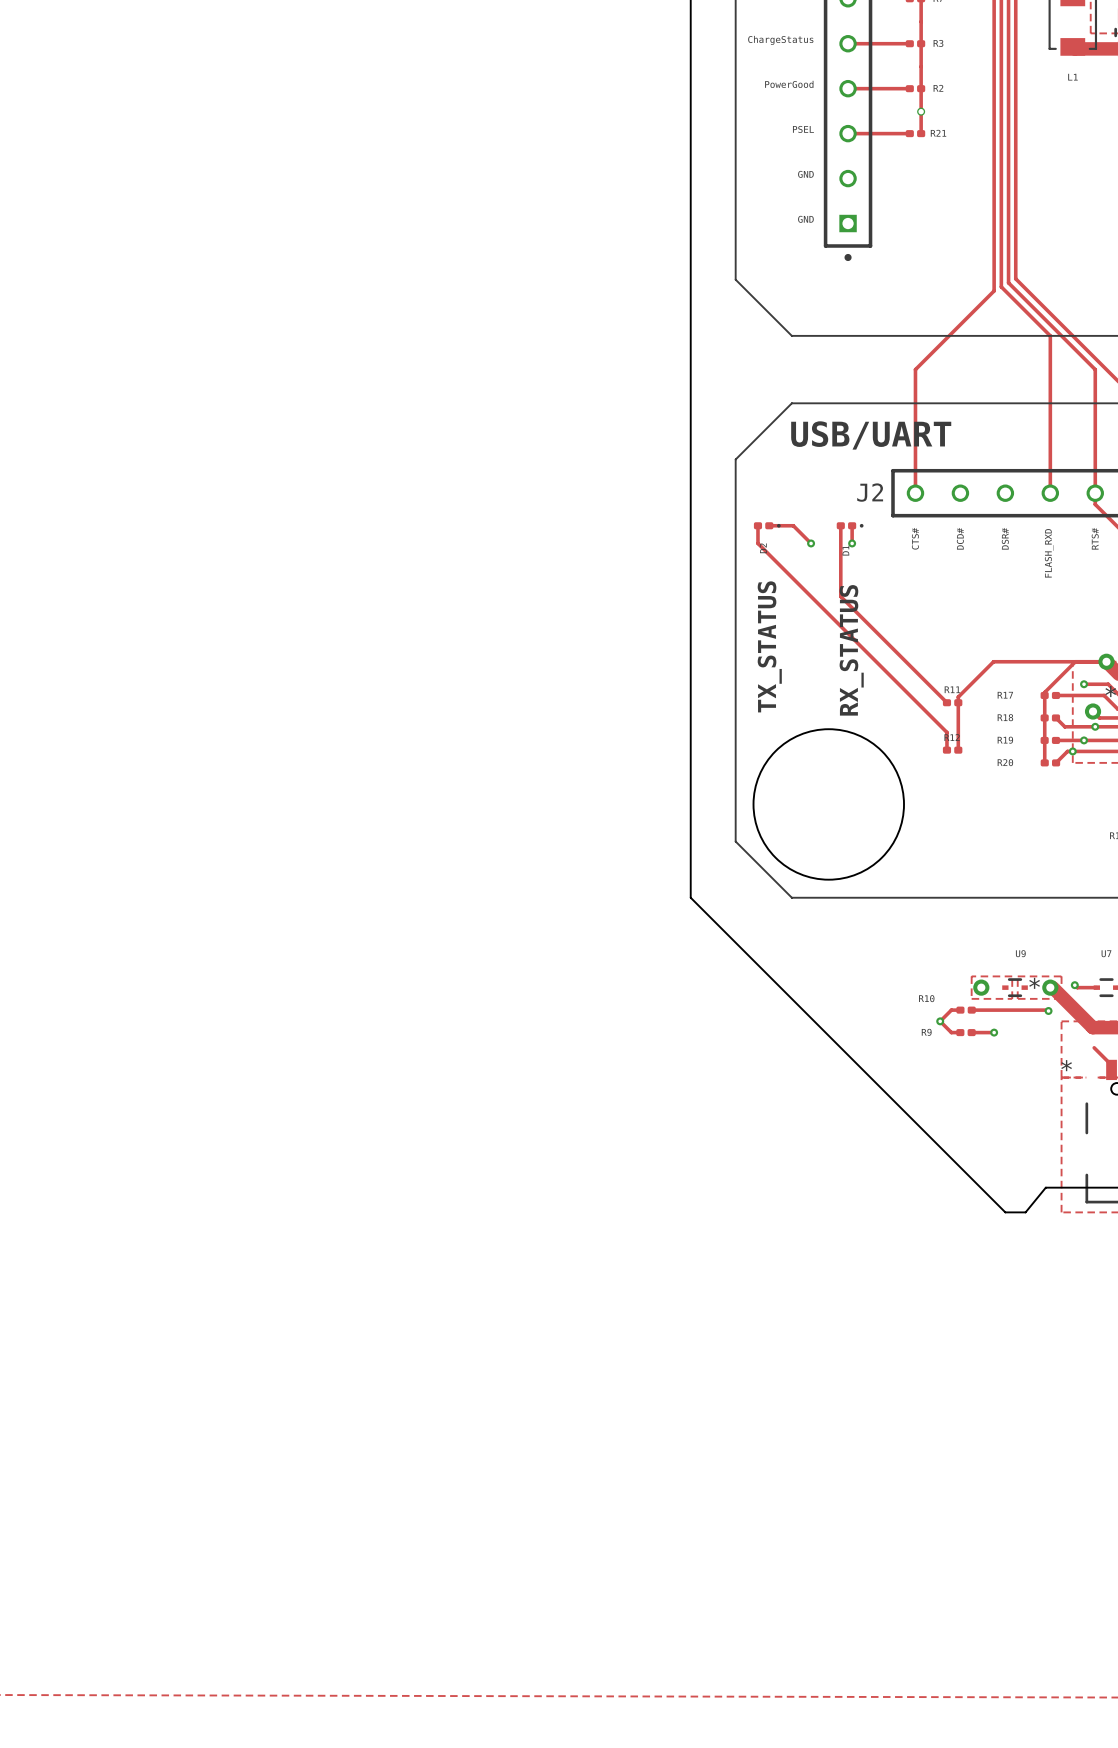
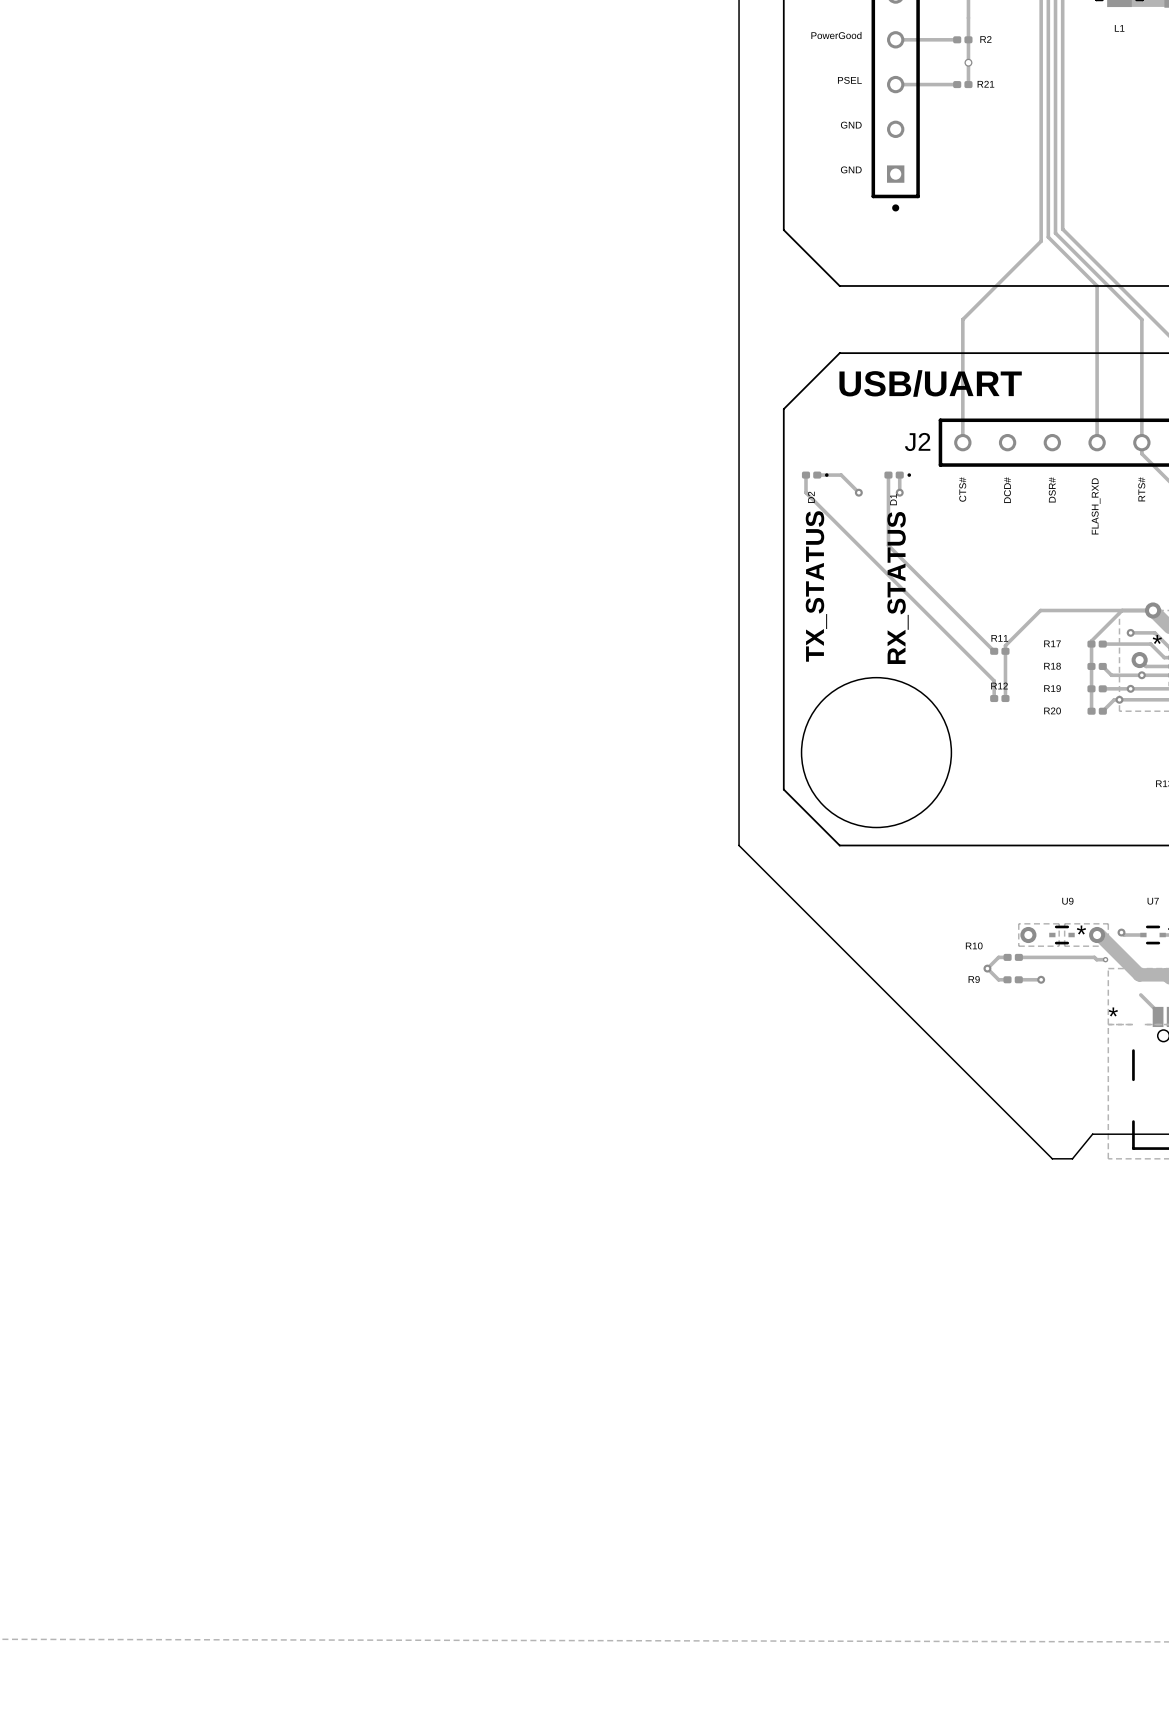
track: none -> (1095, 958) (1105, 959)
via: (1048, 1010) -> none
via: none -> (1105, 959)

